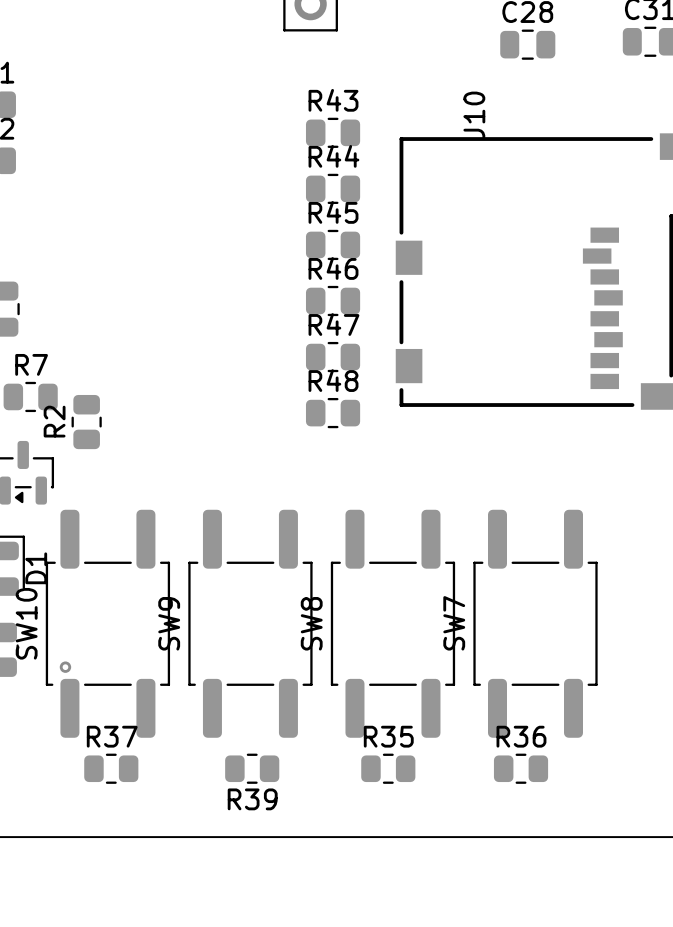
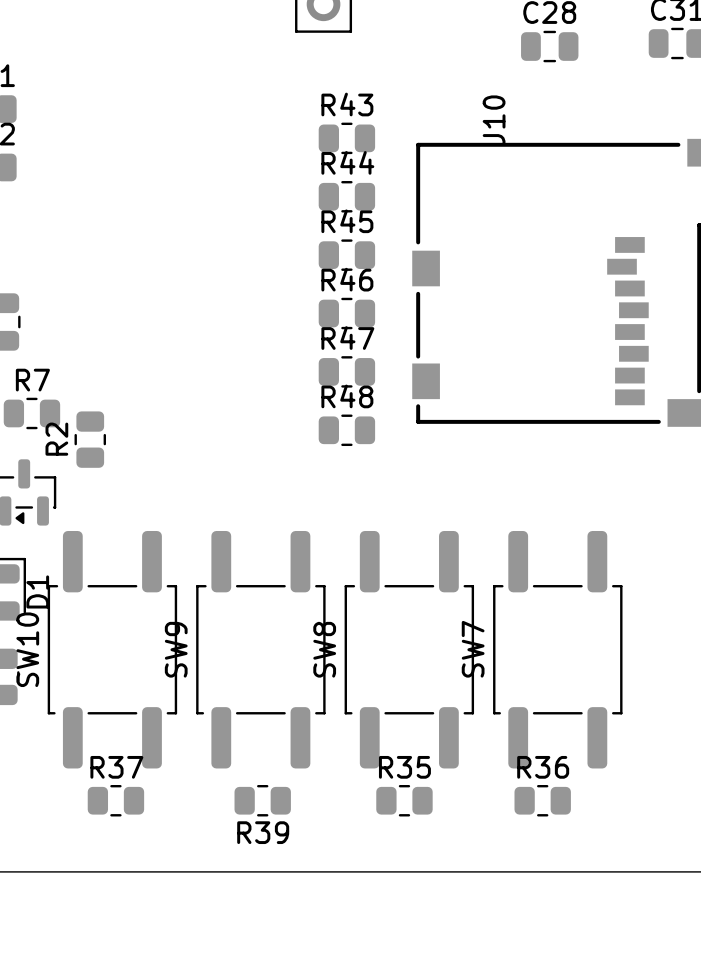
via: (65, 667) -> none

